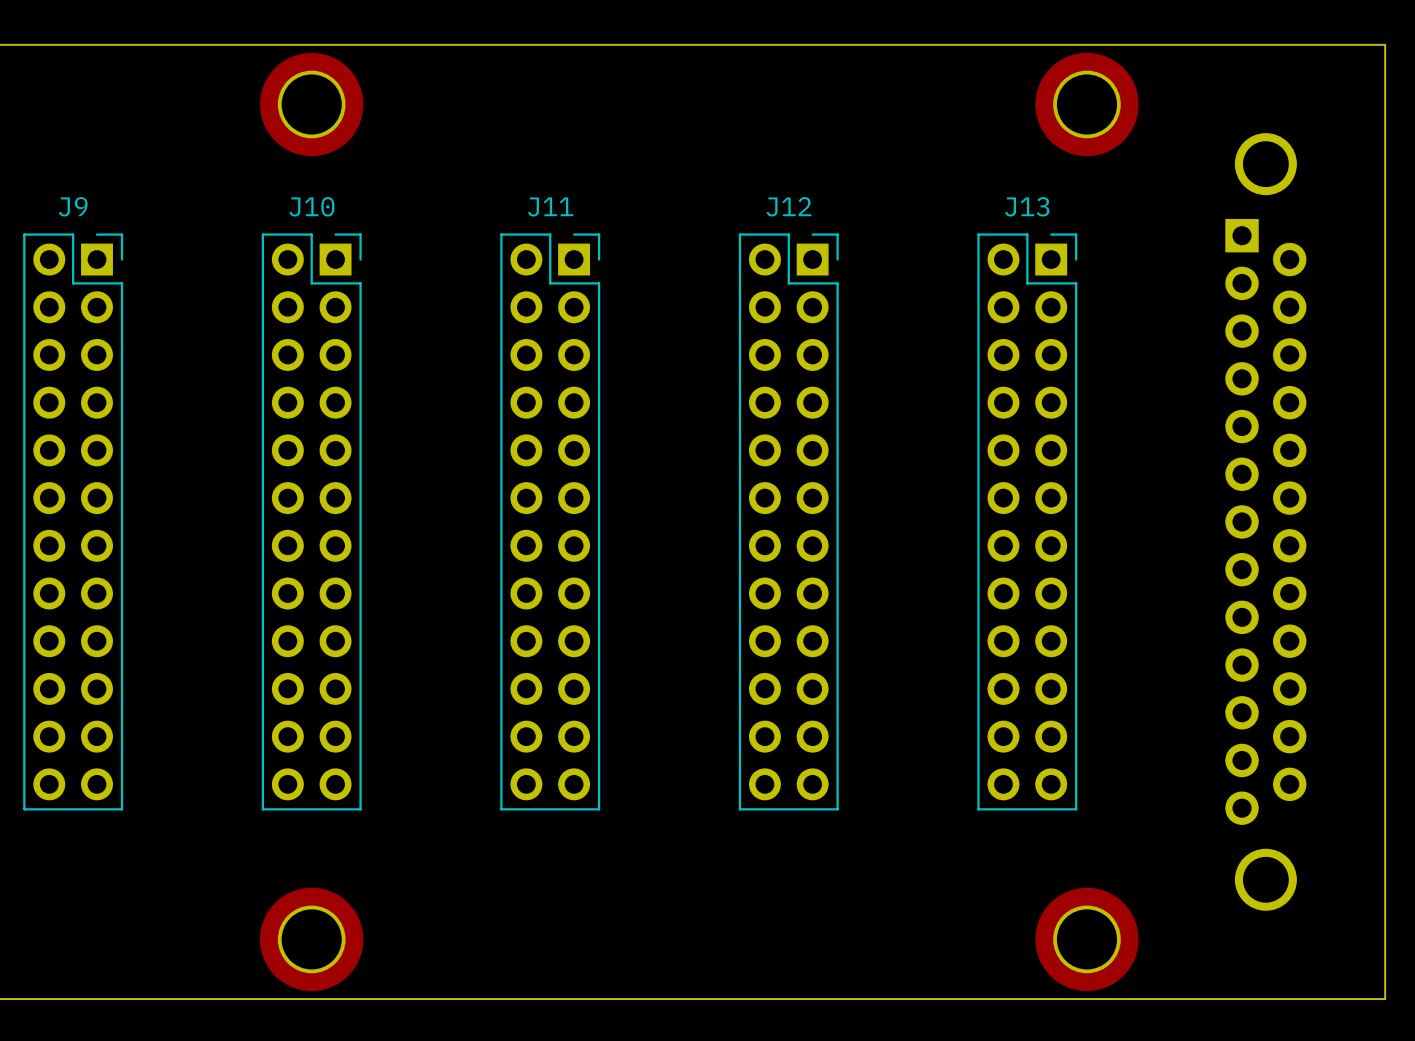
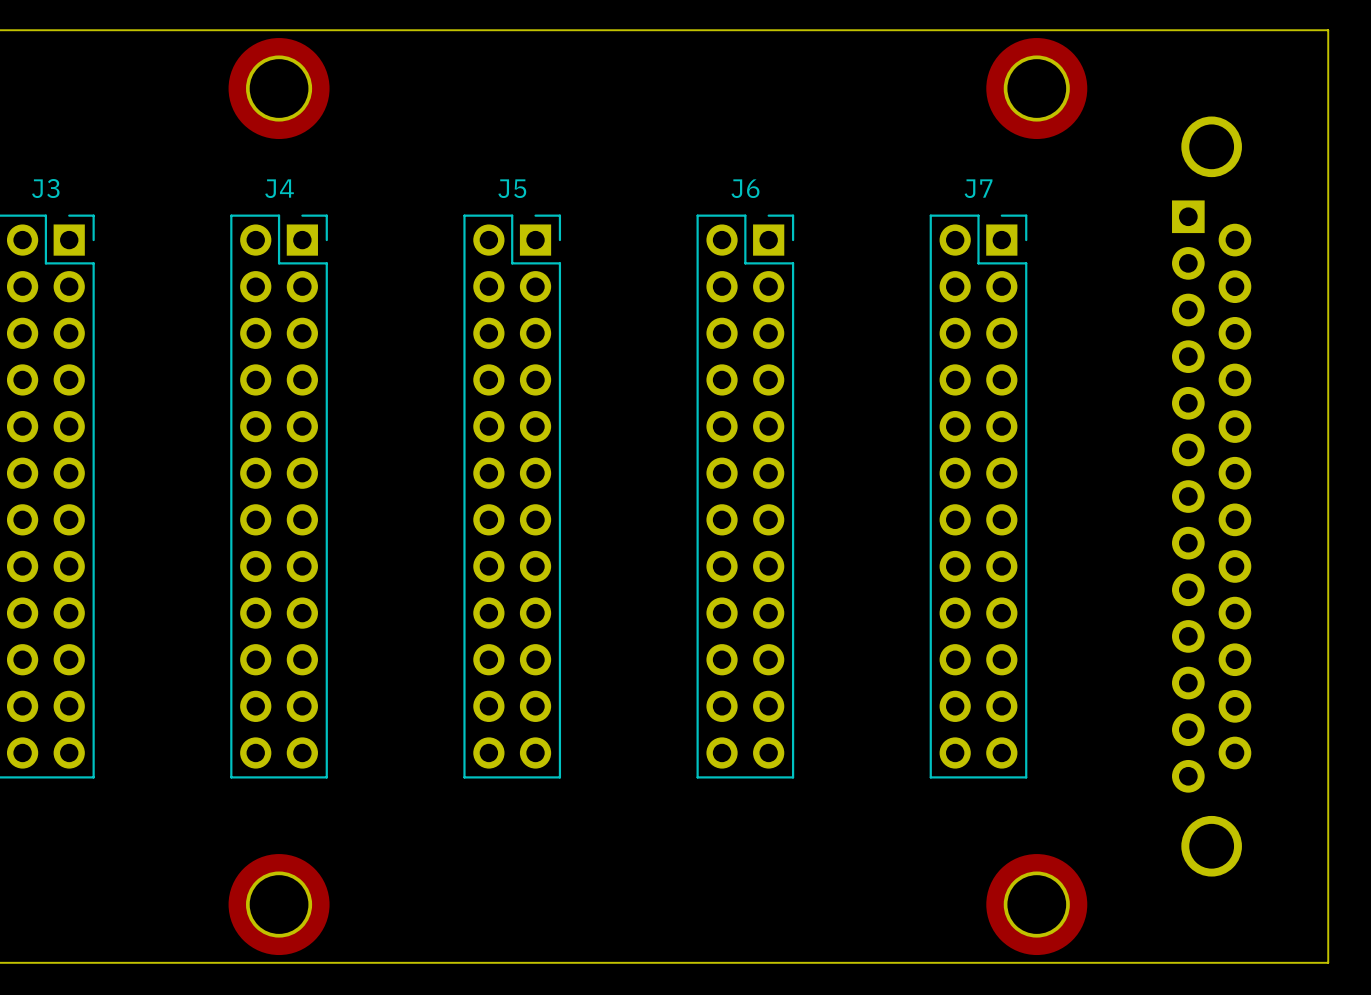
J9 name: J9 (73, 206) -> J3 (45, 188)
J10 name: J10 (311, 206) -> J4 (279, 188)
J11 name: J11 (550, 206) -> J5 (512, 188)
J12 name: J12 (788, 206) -> J6 (745, 188)
J13 name: J13 (1027, 206) -> J7 (978, 188)

